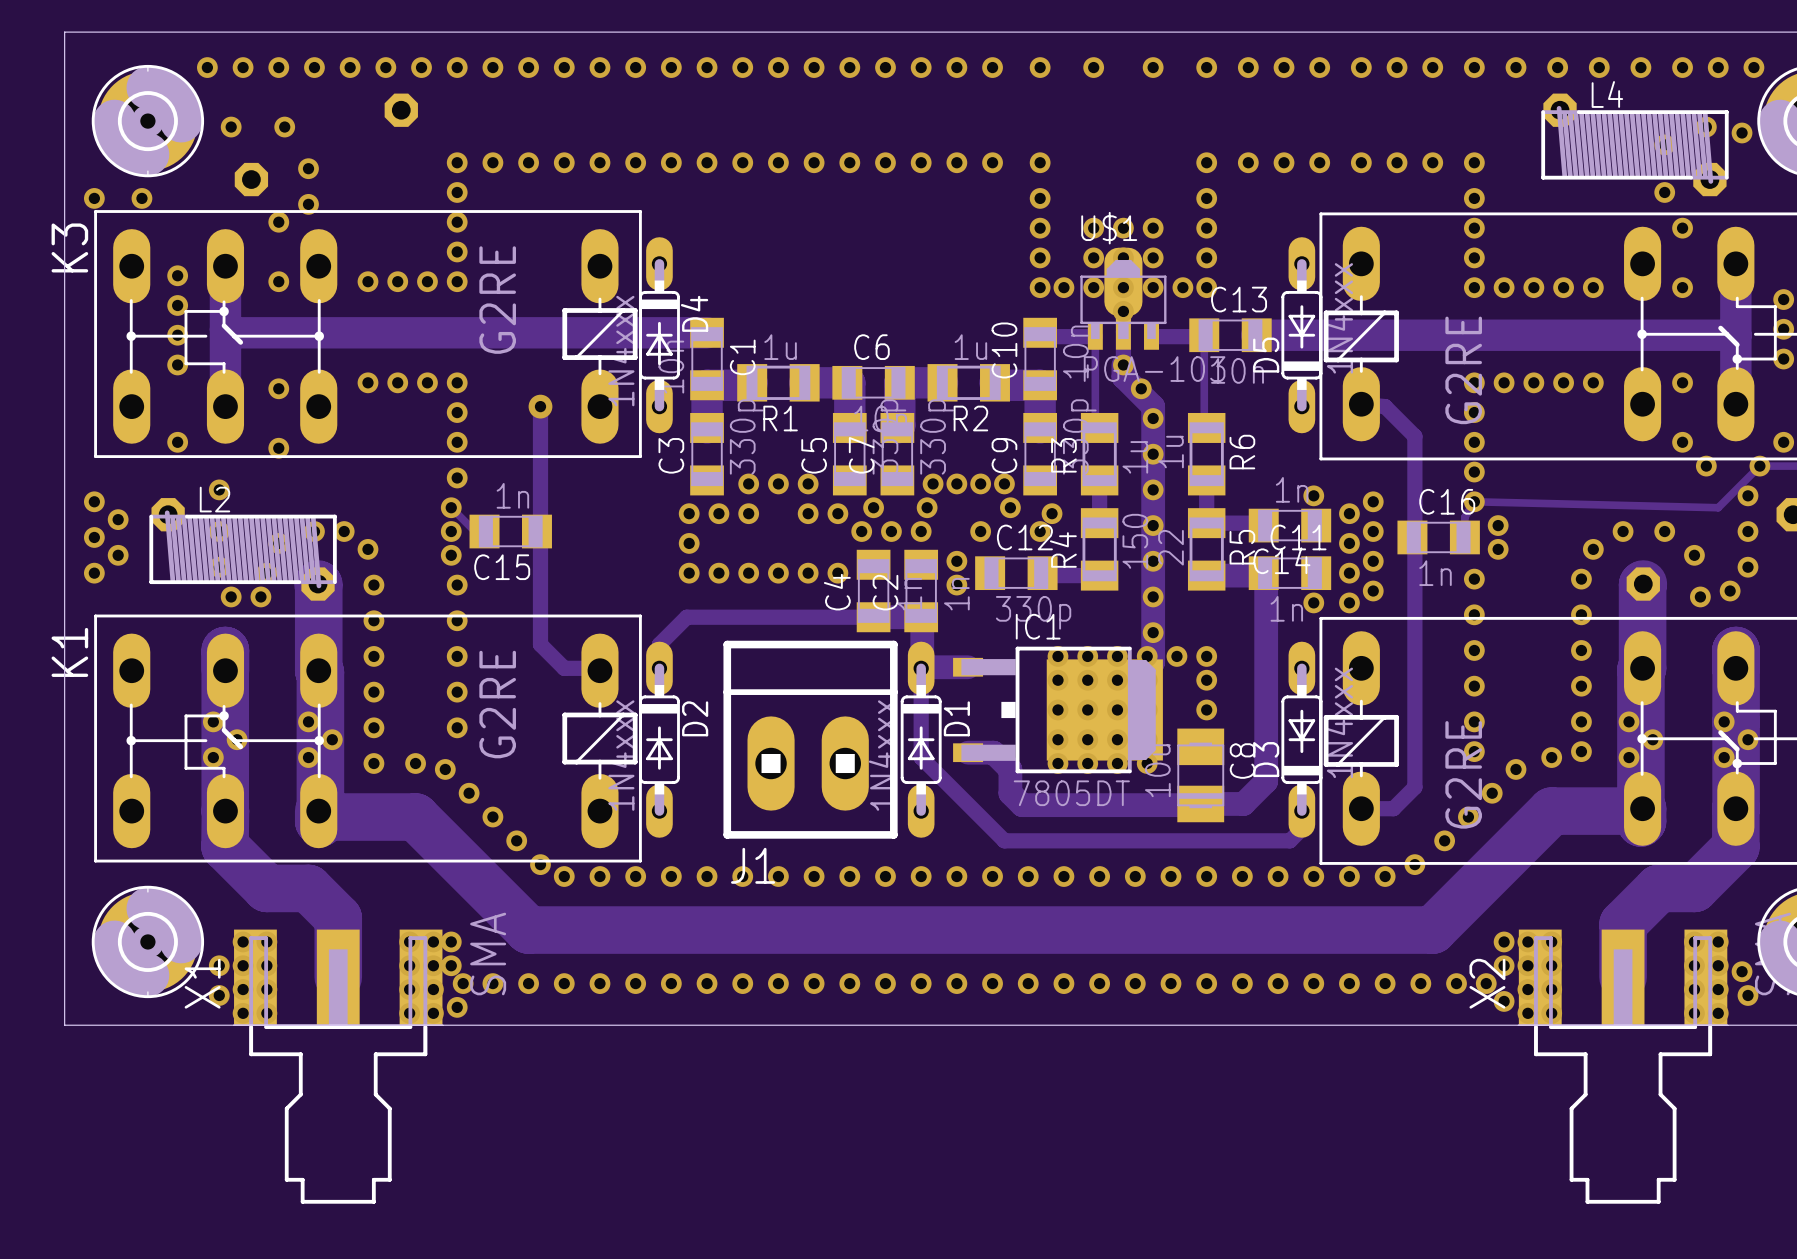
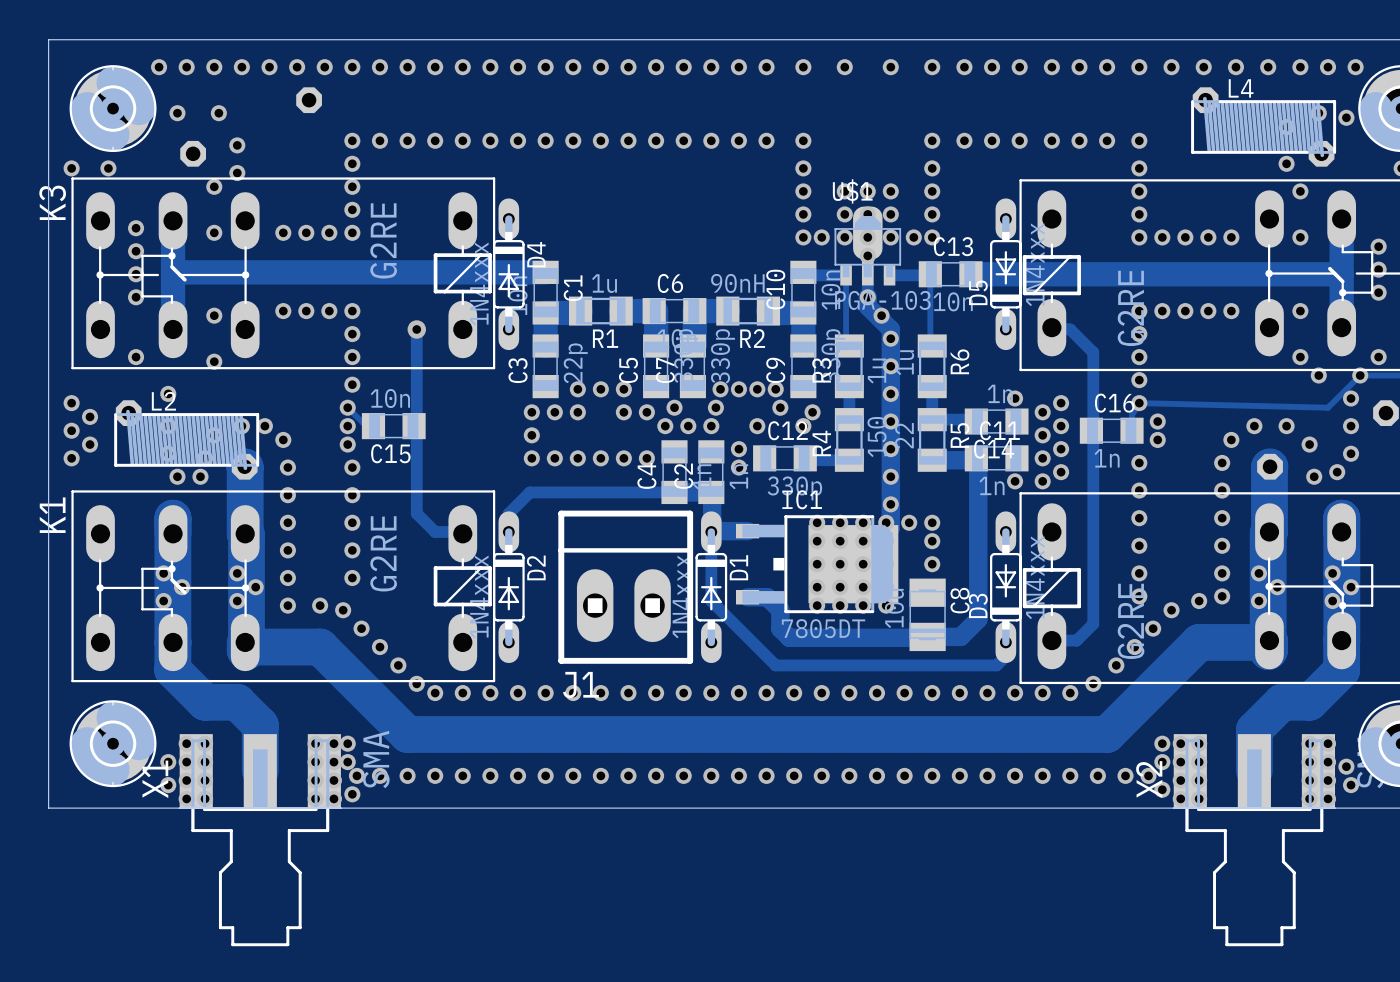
R2 value: 1u (970, 347) -> 90nH (737, 283)
C3 value: 330p (746, 436) -> 22p (575, 363)
C15 value: 1n (512, 495) -> 10n (390, 398)

